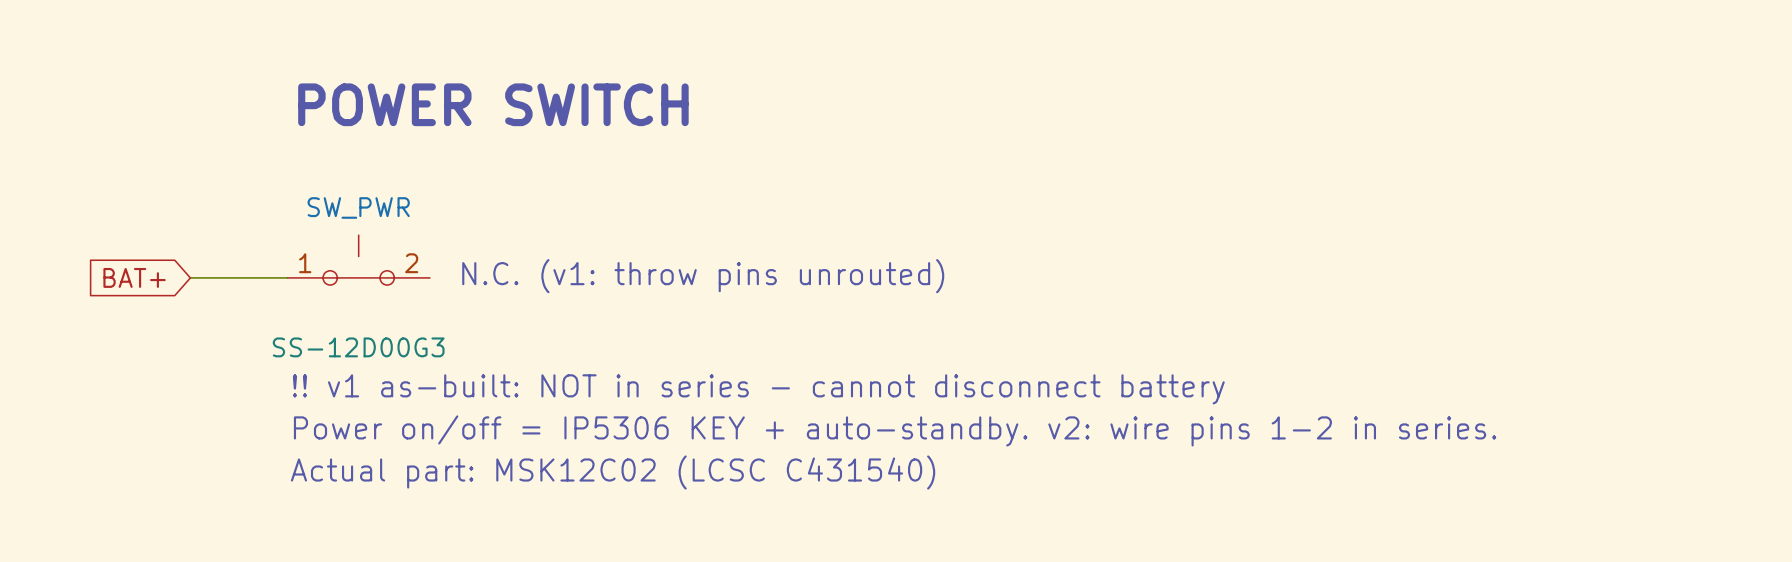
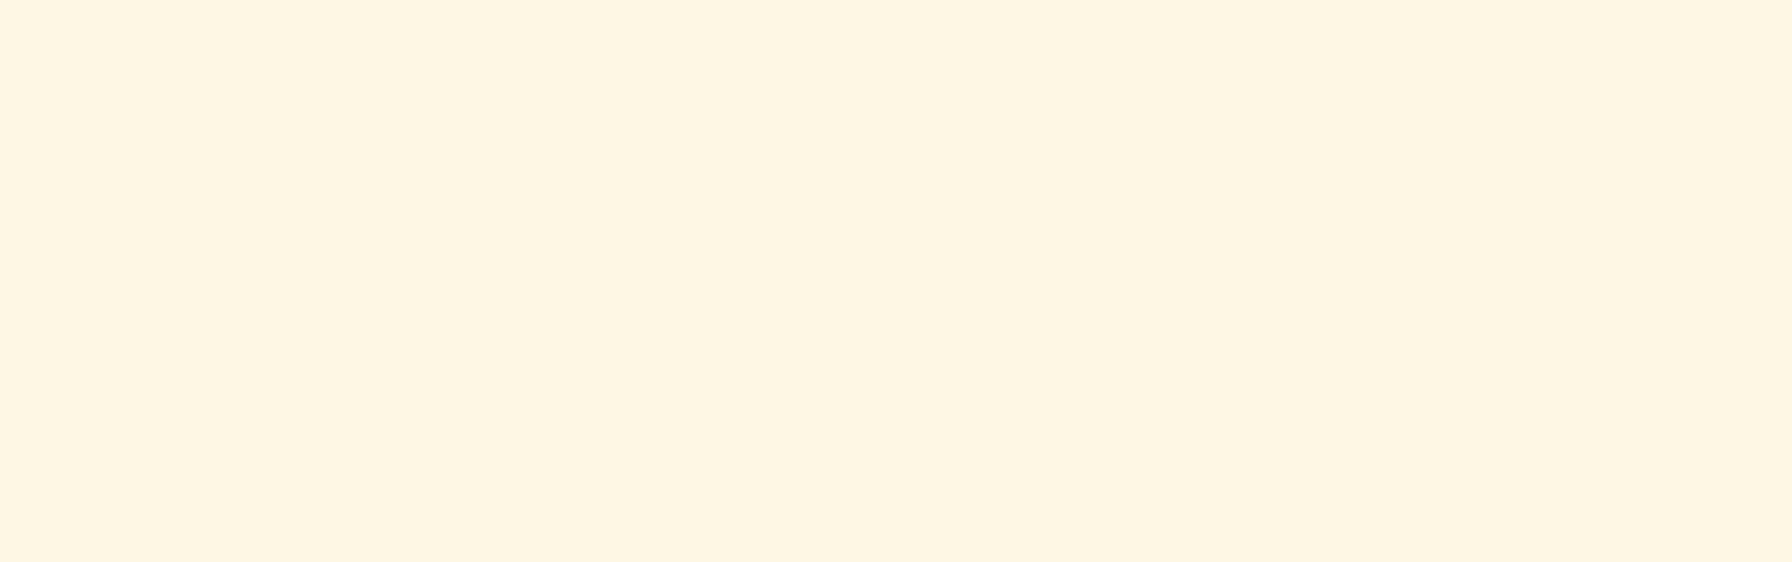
text: POWER SWITCH (493, 104) -> none
SW_PWR: SS-12D00G3 (358, 260) -> none
text: N.C. (v1: throw pins unrouted) (703, 276) -> none
global label: BAT+ (134, 277) -> none
wire: (190, 277) (287, 277) -> none
text: !! v1 as-built: NOT in series - cannot disconnect battery (758, 389) -> none
text: Power on/off = IP5306 KEY + auto-standby. v2: wire pins 1-2 in series. (895, 430) -> none
text: Actual part: MSK12C02 (LCSC C431540) (613, 472) -> none

